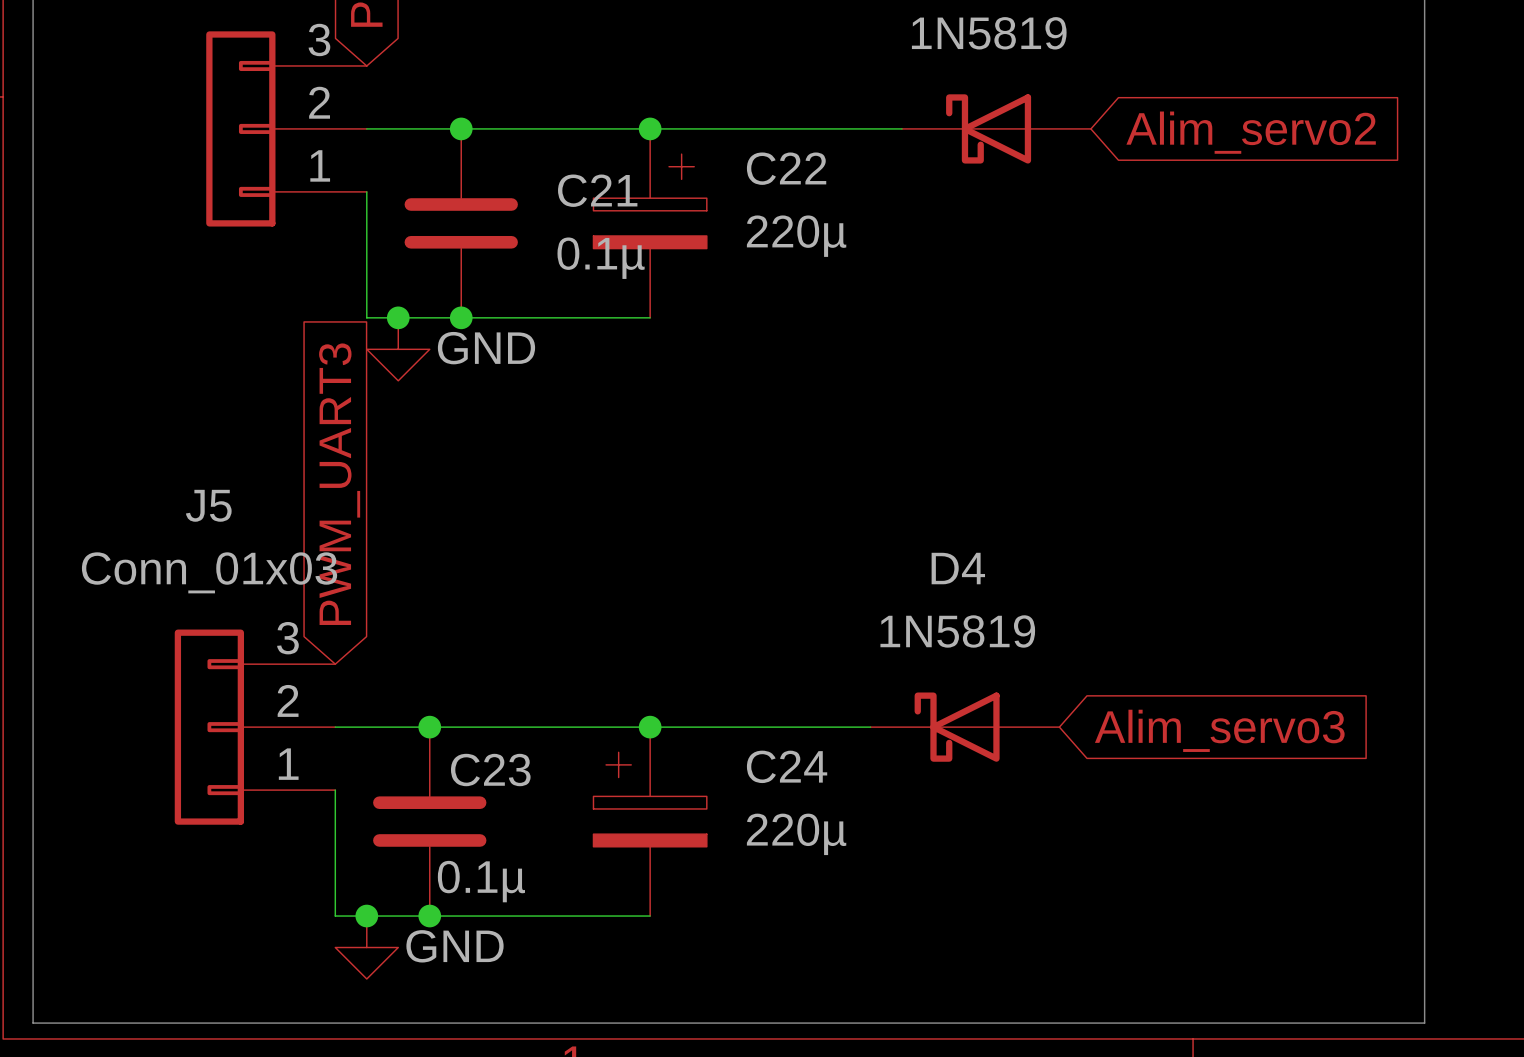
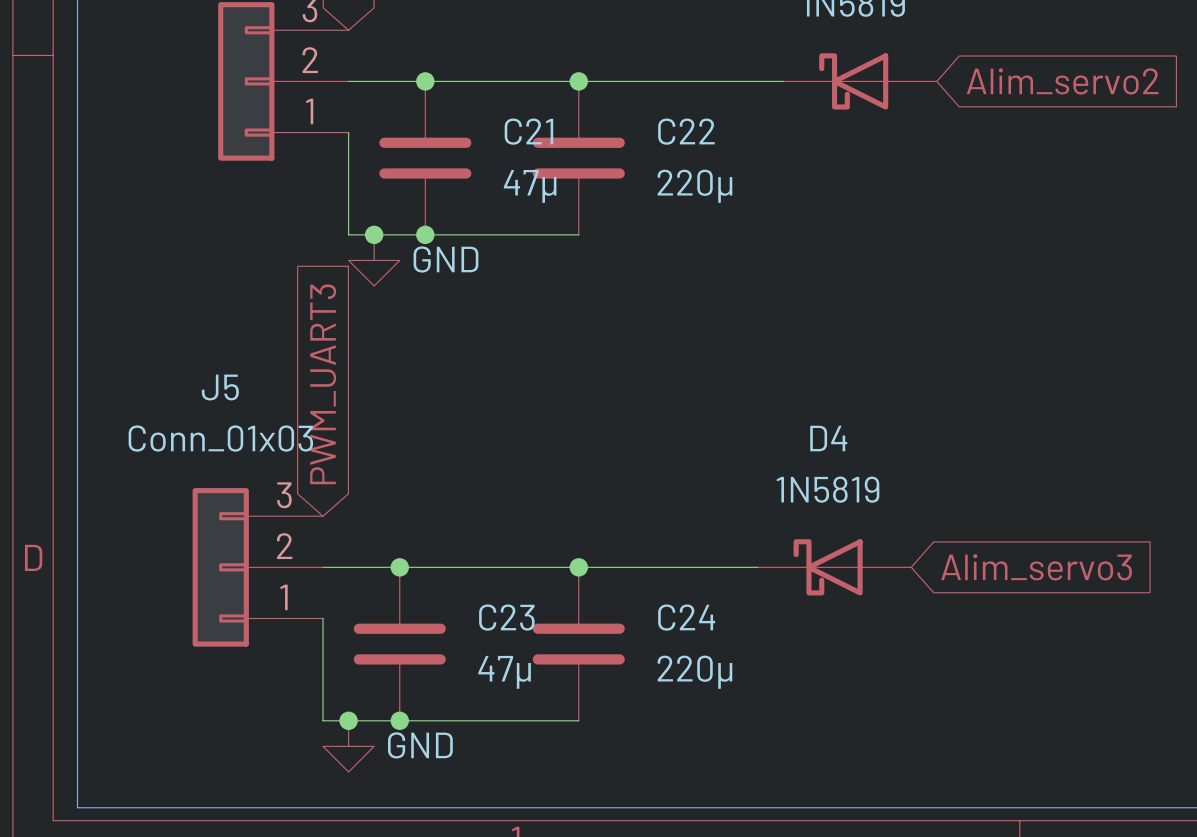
C22 symbol: [593, 128, 707, 318] -> [532, 81, 625, 235]
C21 value: 0.1µ (601, 258) -> 47µ (530, 186)
C24 symbol: [593, 727, 707, 917] -> [532, 567, 625, 721]
C23 name position: C23 (490, 770) -> C23 (506, 617)
C23 value: 0.1µ (481, 881) -> 47µ (504, 672)

